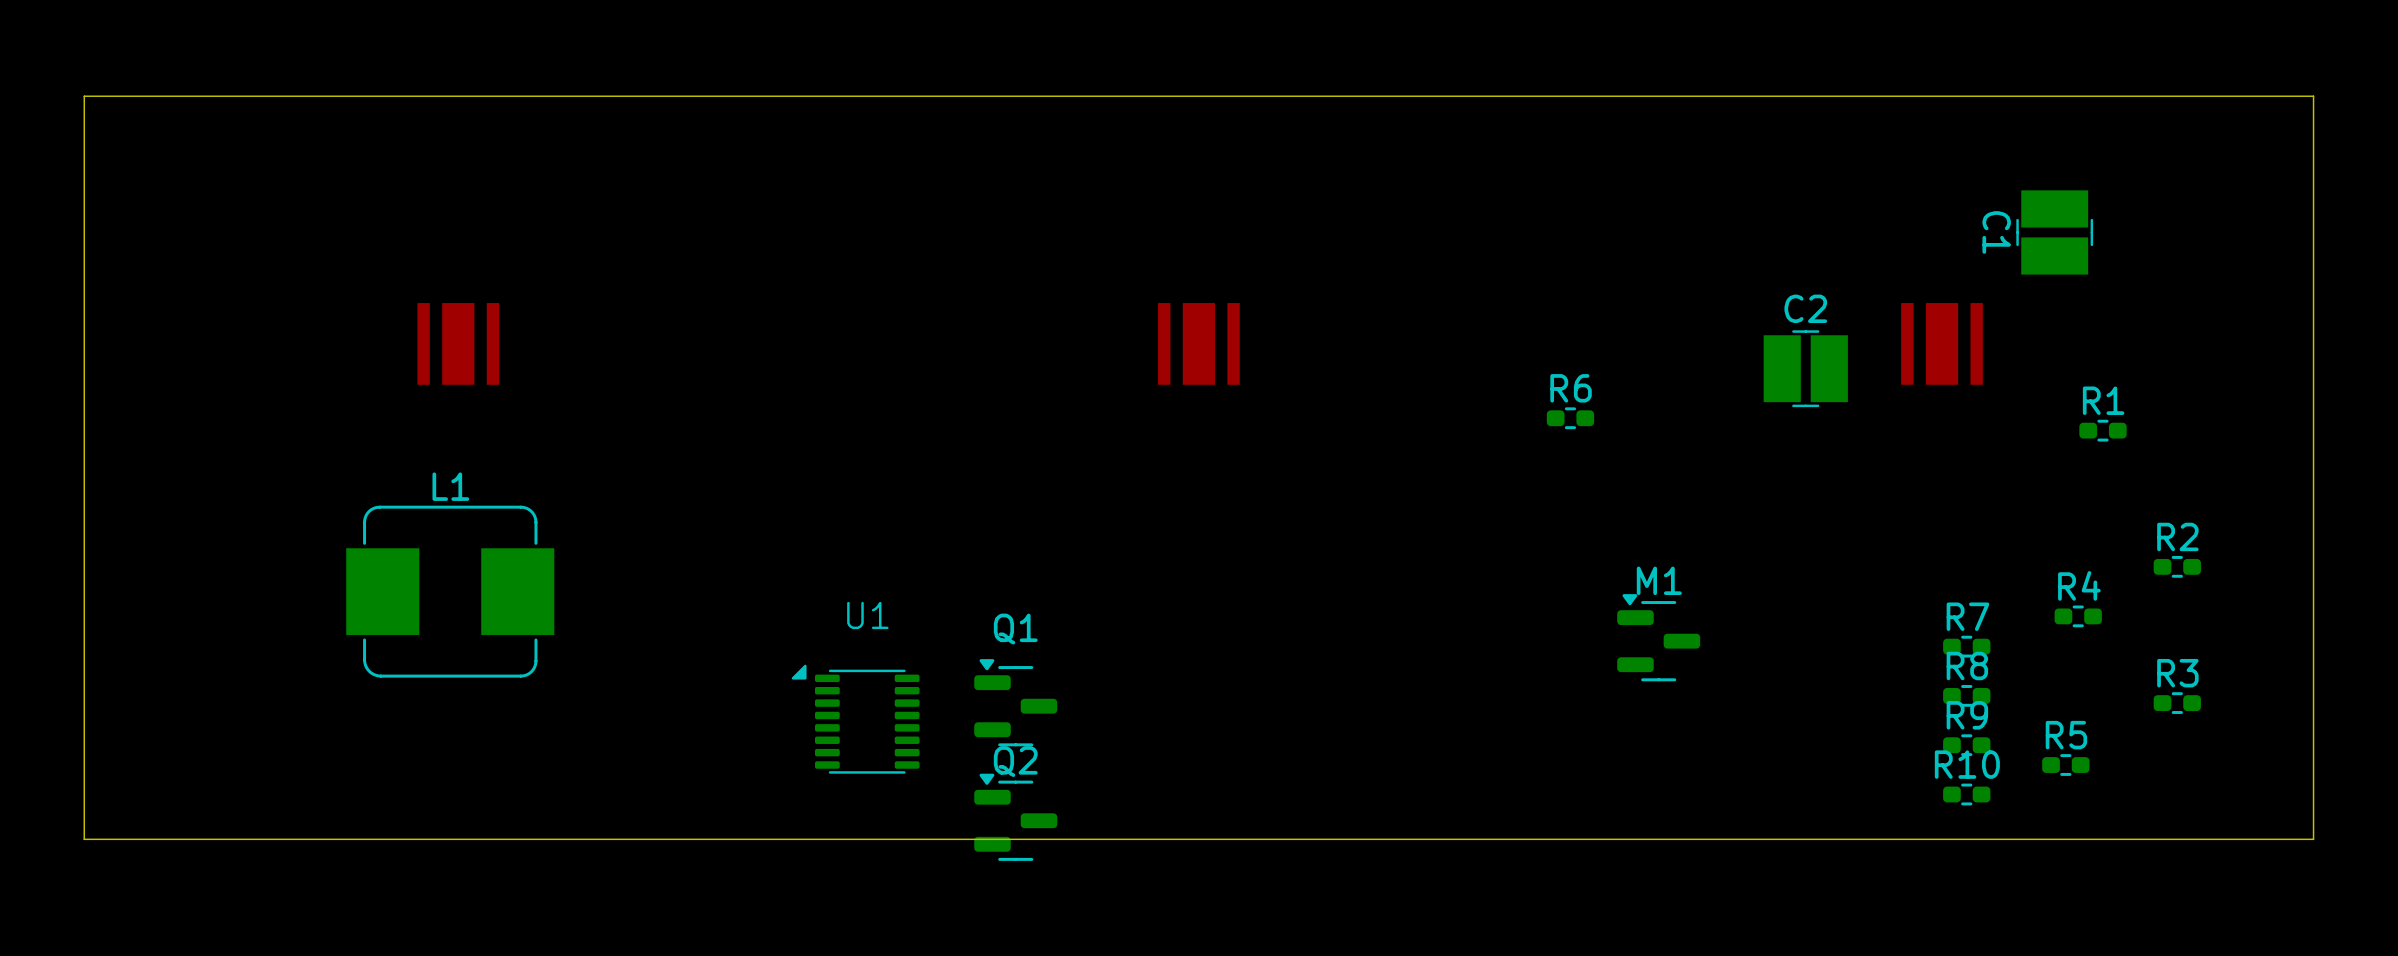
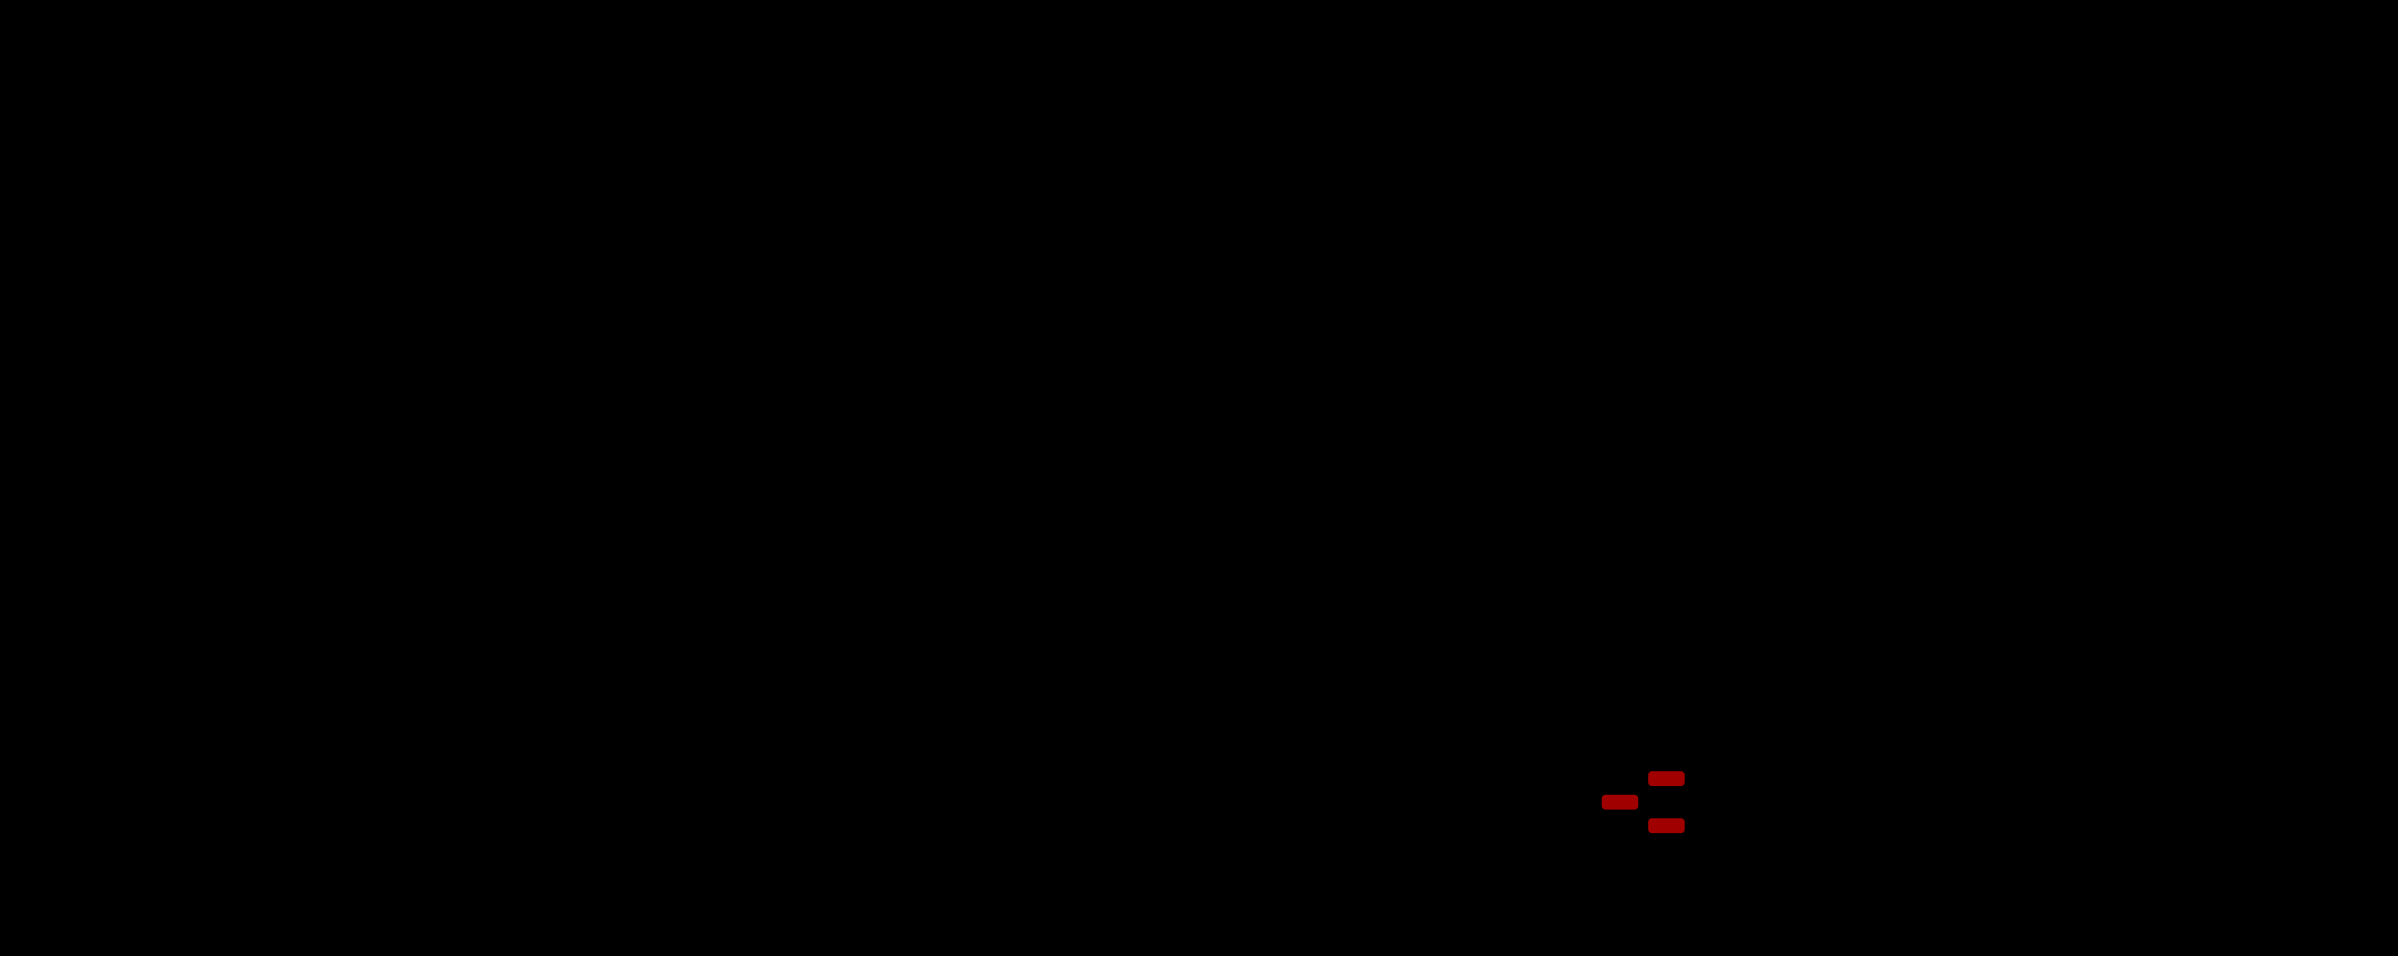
board edge: (2313, 96) (84, 96) (84, 839) (2313, 839) (2313, 96) -> none
C1: (2054, 232) -> none
part: (458, 343) -> none
part: (1198, 343) -> none
part: (1941, 343) -> none
C2: (1805, 368) -> none
R6: (1570, 418) -> none
R1: (2103, 430) -> none
R2: (2177, 566) -> none
L1: (450, 591) -> none
R4: (2078, 616) -> none
M1 side: bottom (1658, 637) -> top (1643, 802)
R7: (1966, 646) -> none
R8: (1966, 695) -> none
Q1: (1015, 702) -> none
R3: (2177, 703) -> none
U1: (855, 719) -> none
R9: (1966, 745) -> none
R5: (2065, 765) -> none
R10: (1966, 794) -> none
Q2: (1015, 817) -> none

